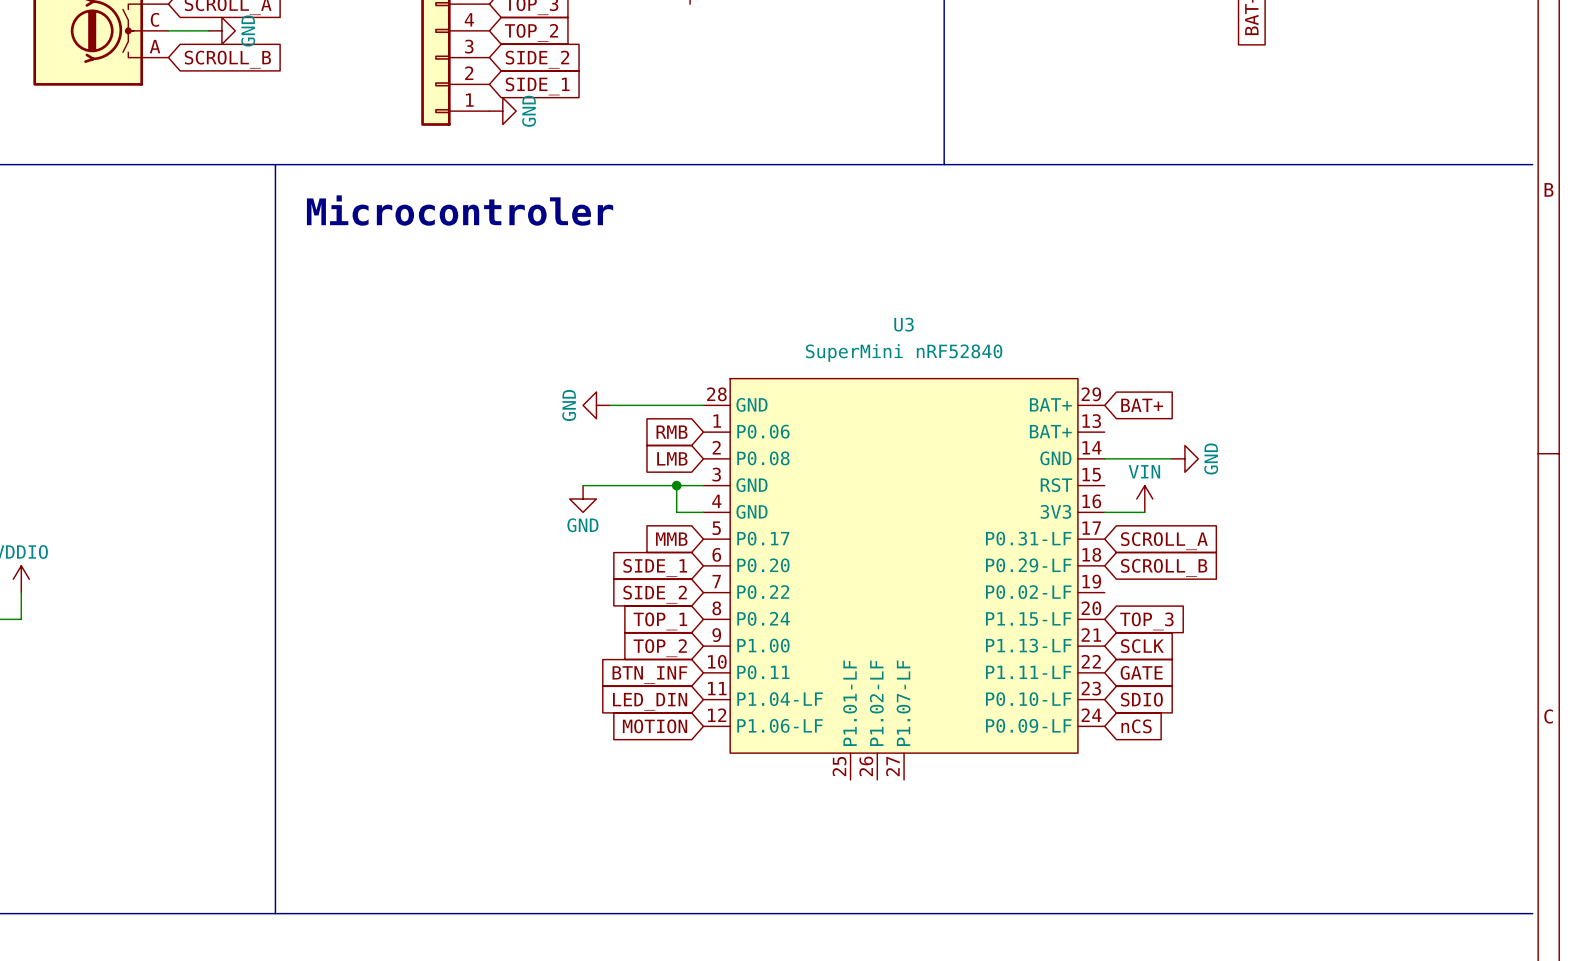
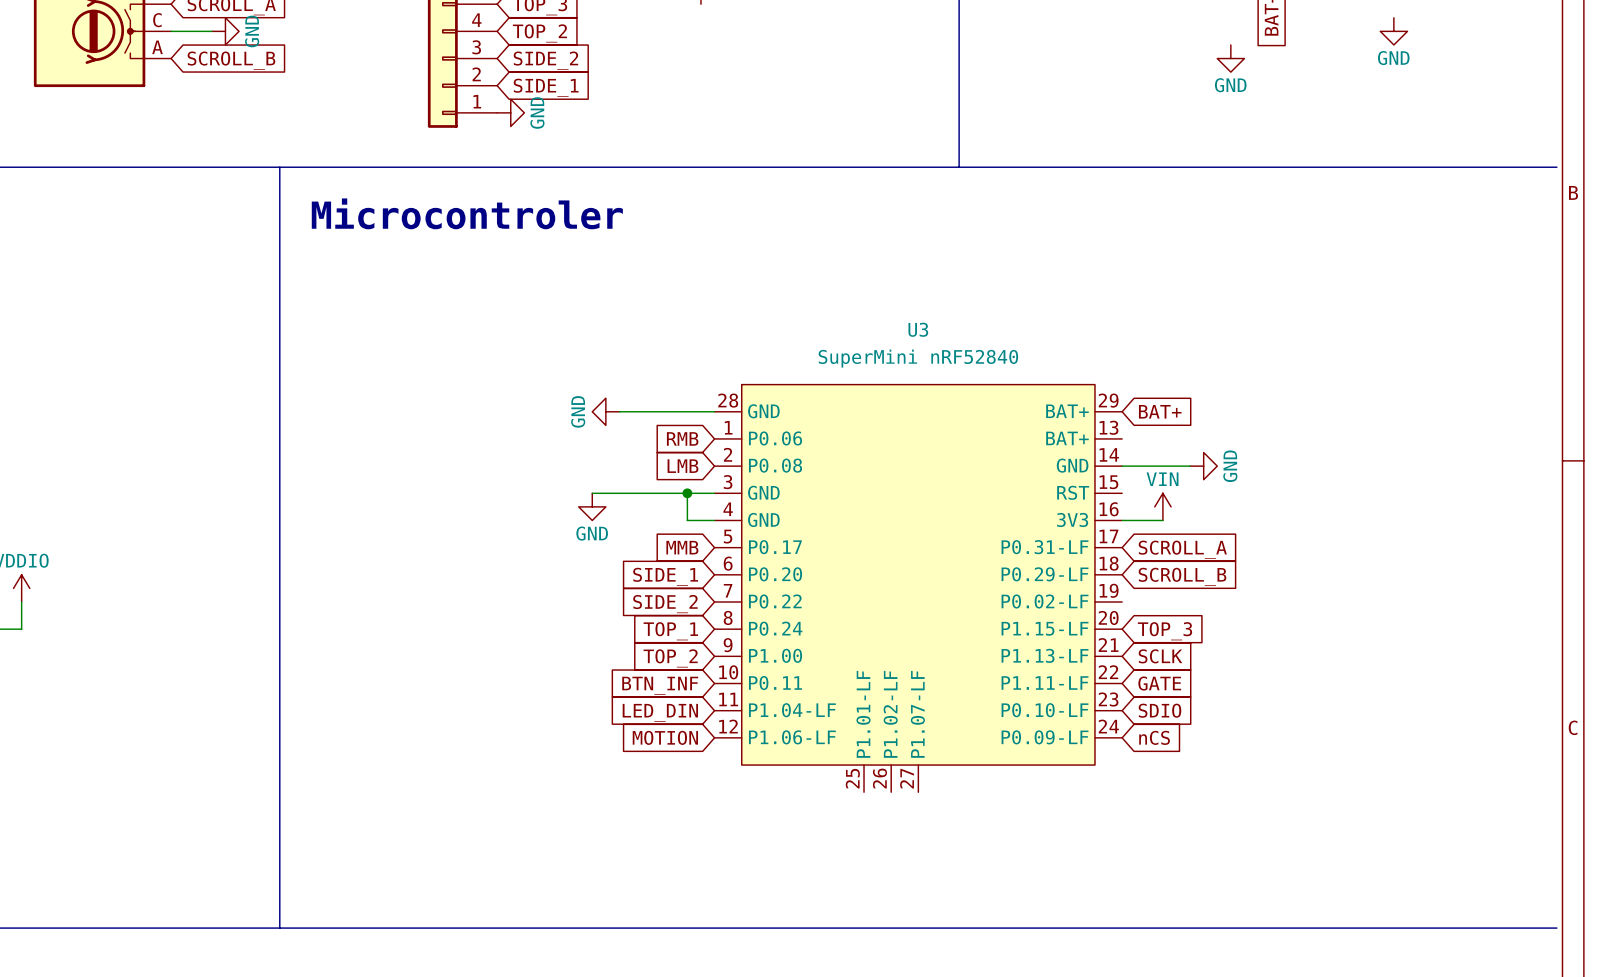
power symbol: none -> GND (1393, 31)
power symbol: none -> GND (1230, 58)

